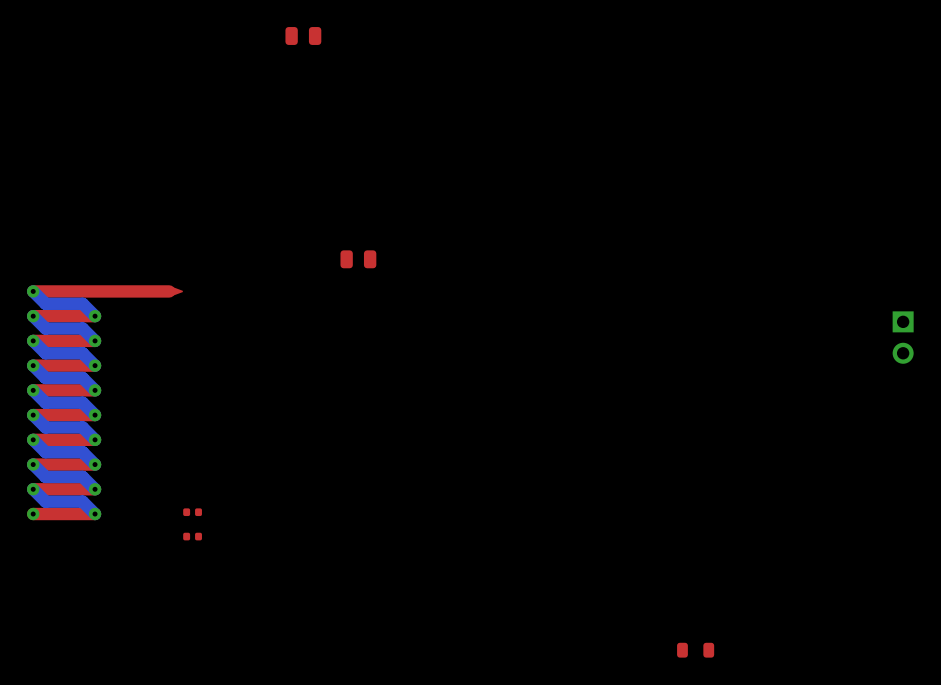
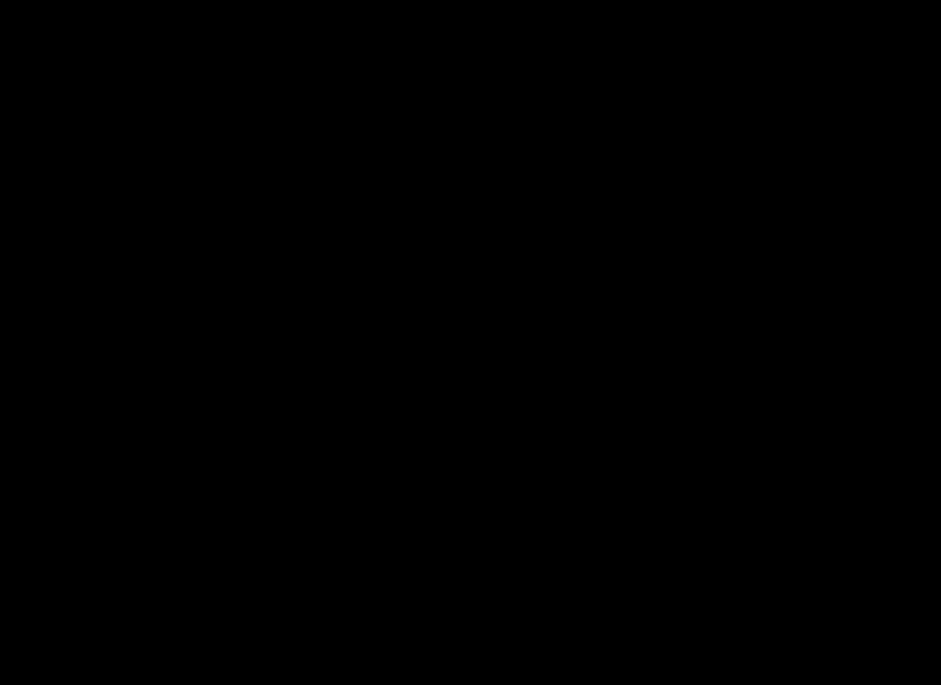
part: (303, 35) -> none
part: (358, 259) -> none
part: (903, 337) -> none
part: (104, 402) -> none
part: (192, 512) -> none
part: (192, 536) -> none
part: (695, 650) -> none

